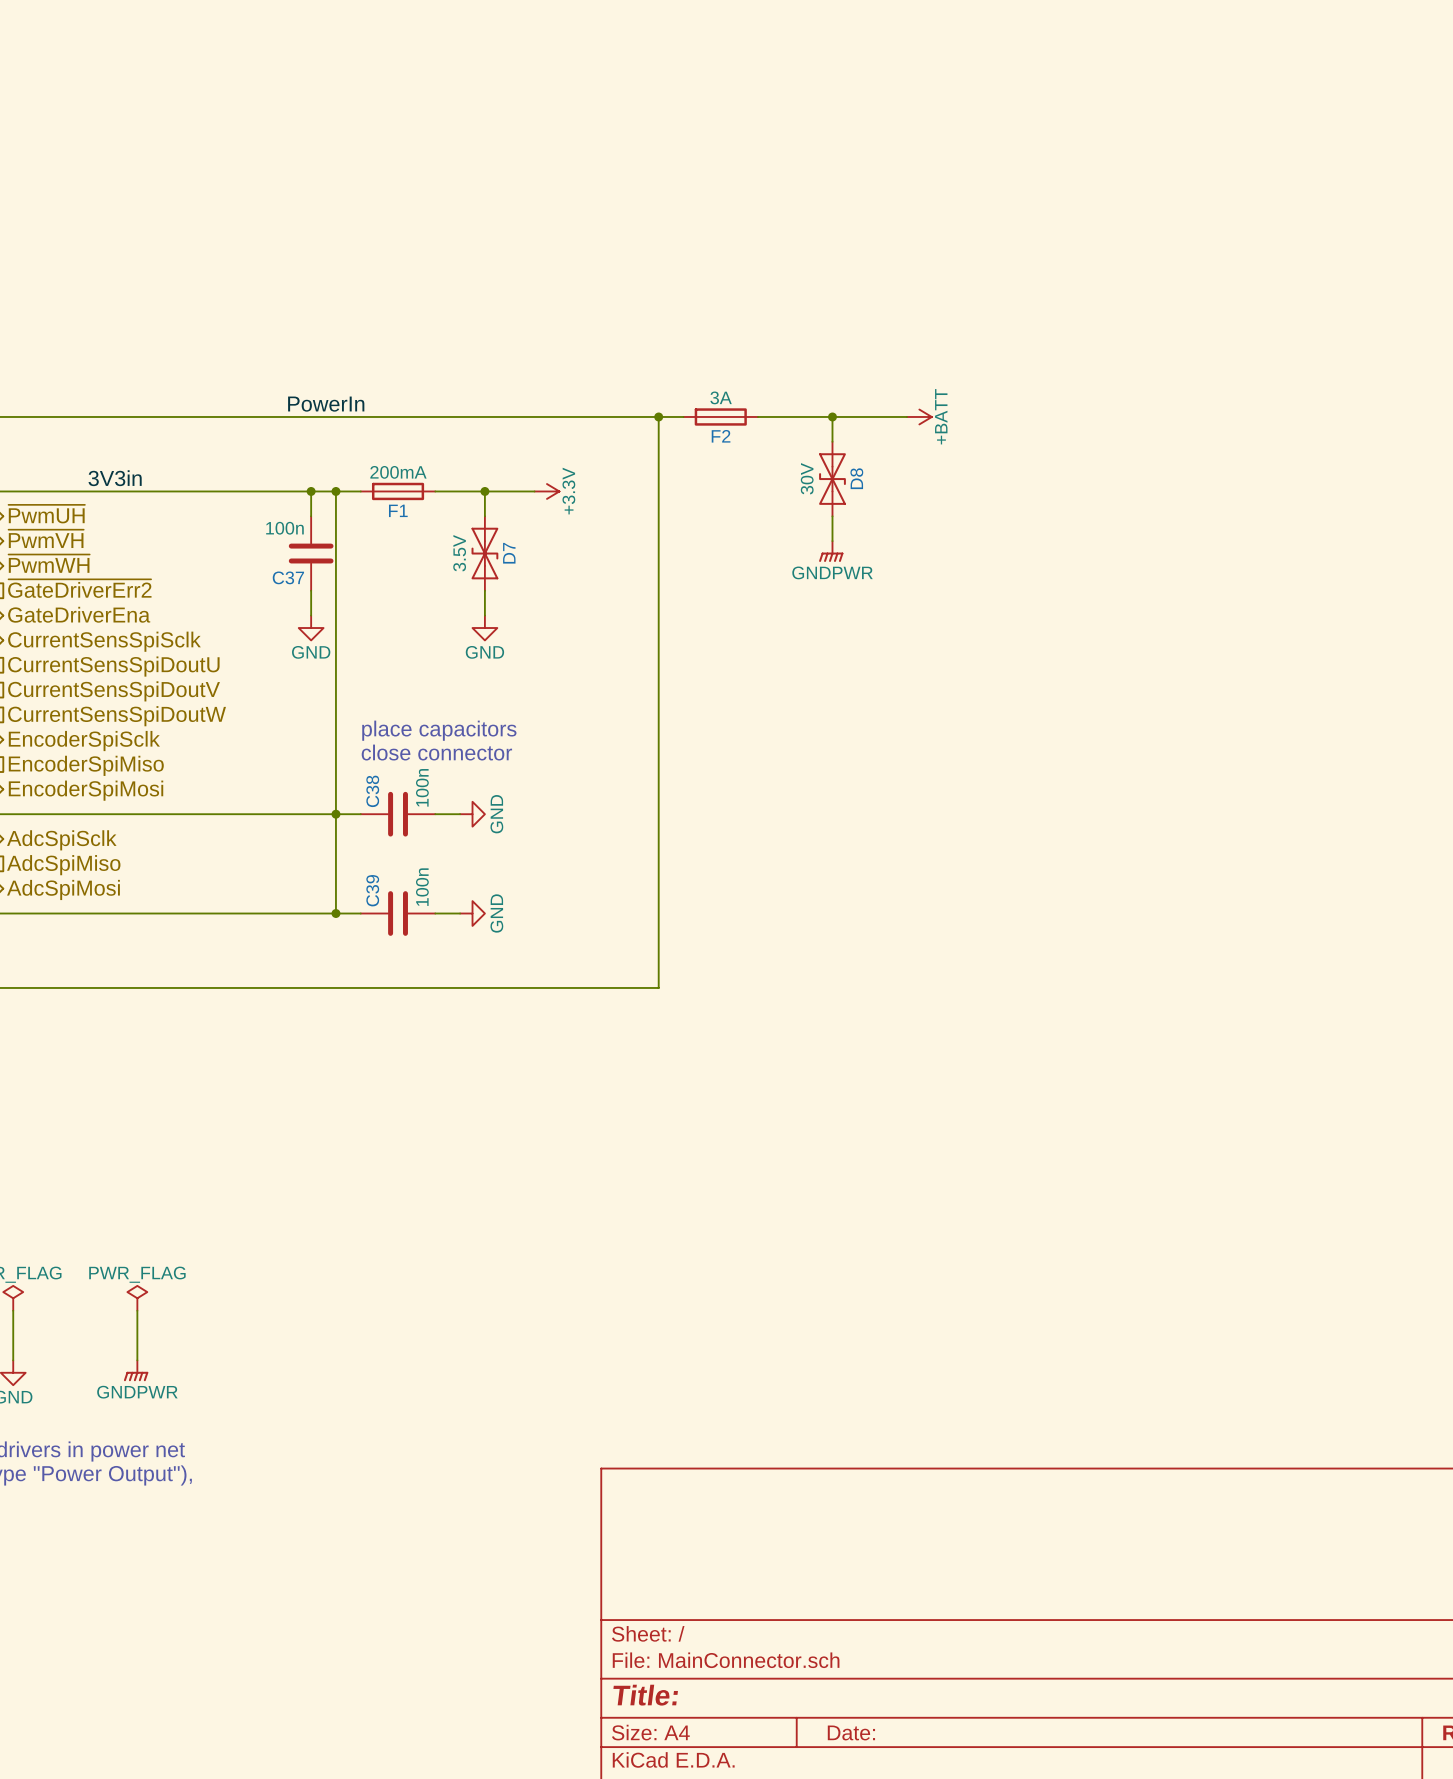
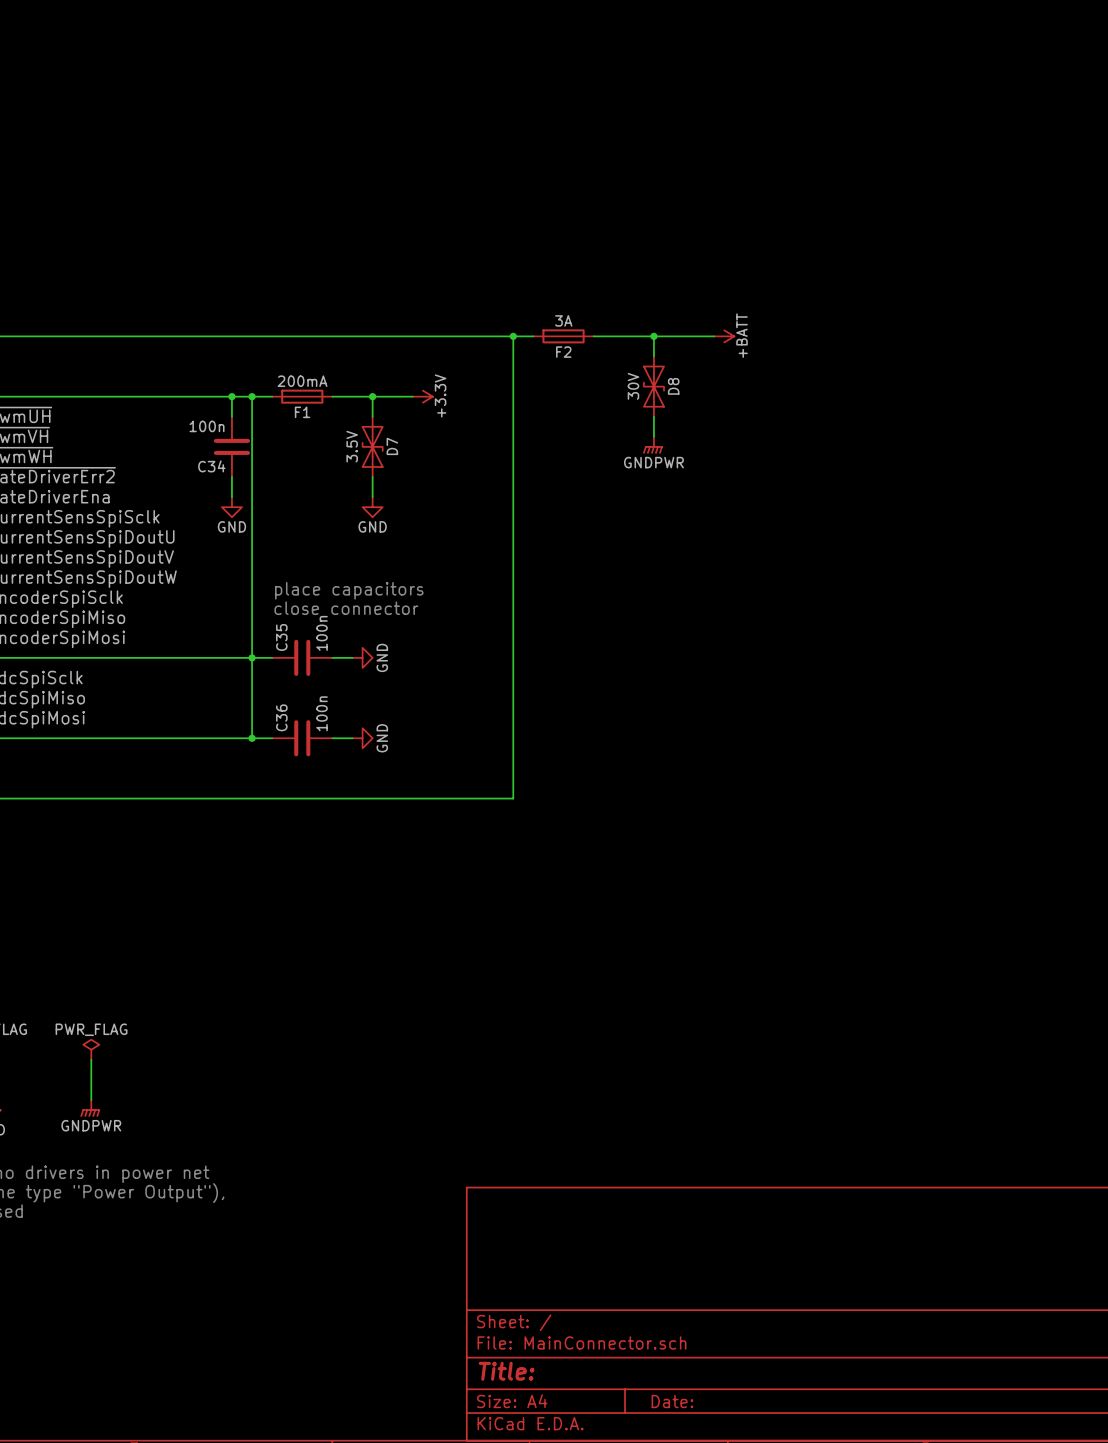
label: PowerIn (326, 404) -> none
label: 3V3in (115, 478) -> none
C37 name: C37 (288, 577) -> C34 (211, 466)
C38 name: C38 (372, 791) -> C35 (281, 637)
C39 name: C39 (372, 890) -> C36 (281, 717)

